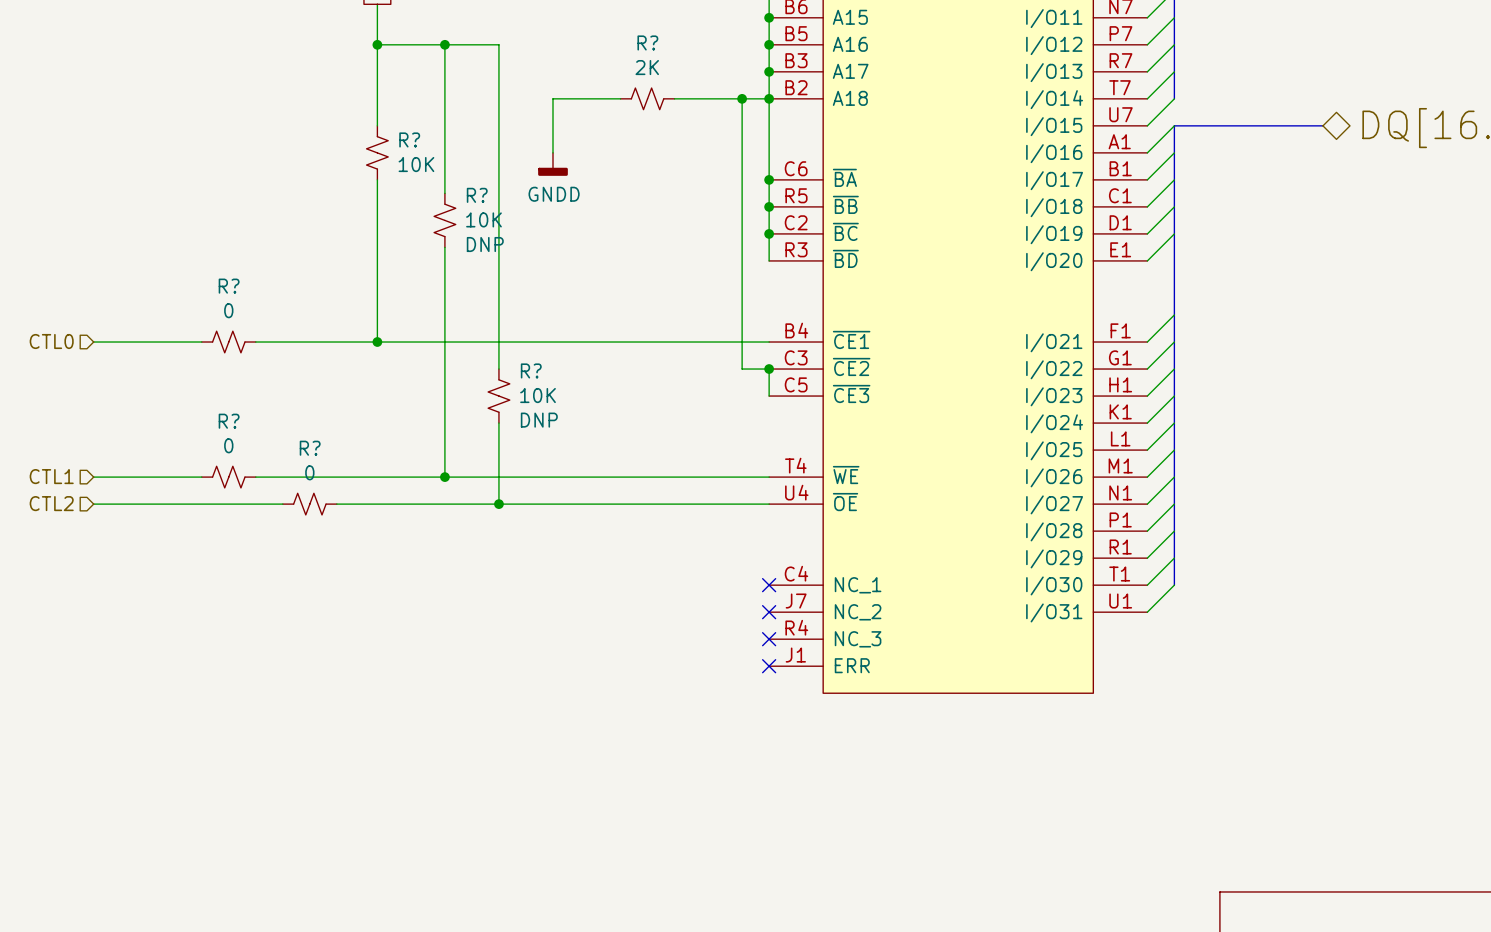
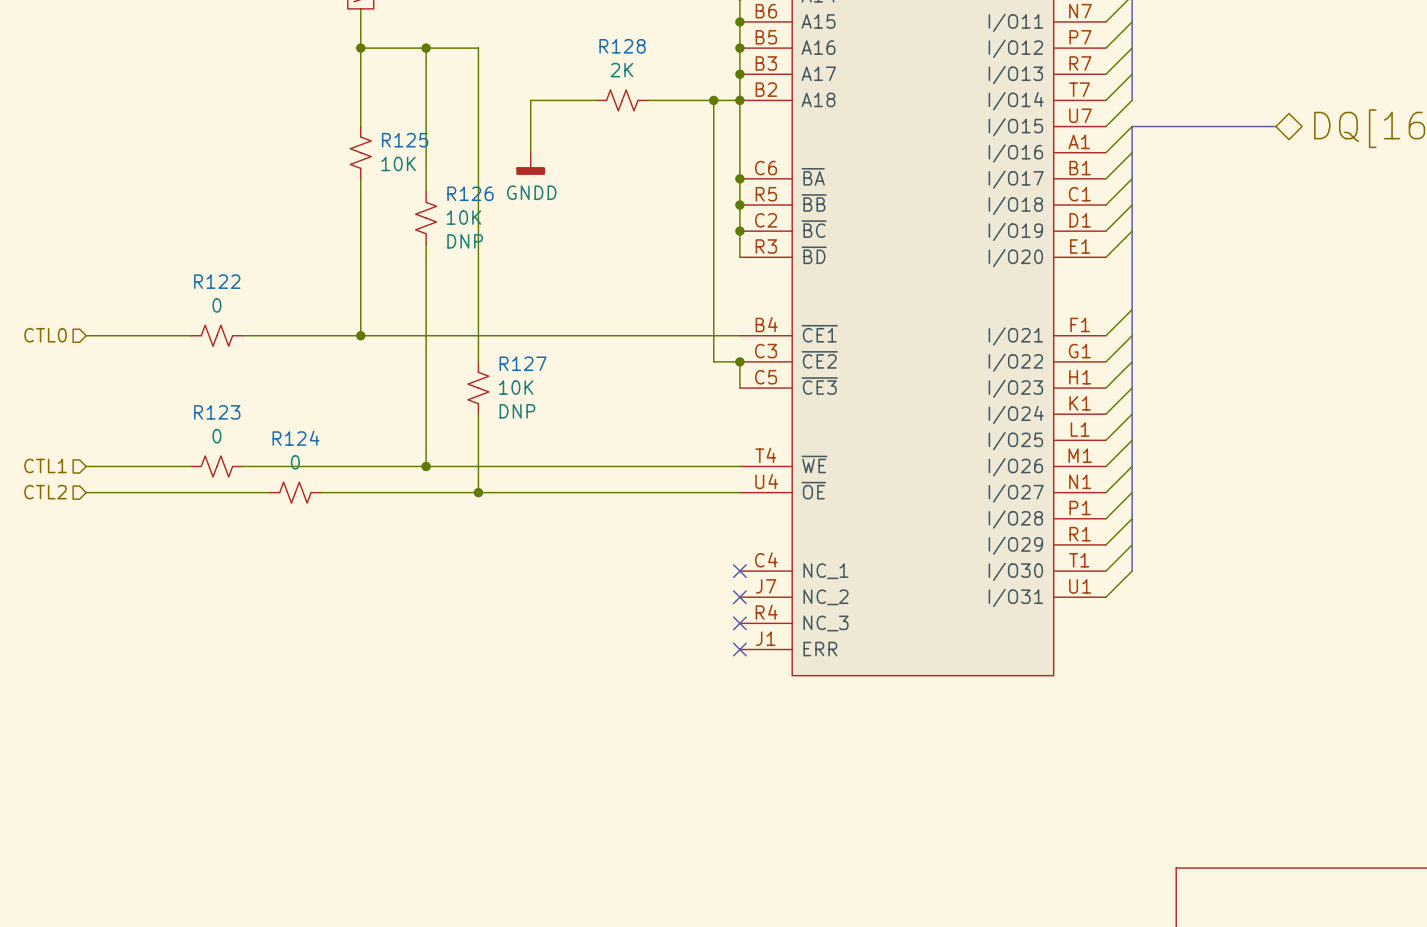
R? name: R? (647, 42) -> R128 (622, 46)
R? name: R? (409, 139) -> R125 (405, 140)
R? name: R? (477, 195) -> R126 (470, 193)
R? name: R? (229, 286) -> R122 (217, 281)
R? name: R? (531, 370) -> R127 (523, 363)
R? name: R? (229, 421) -> R123 (217, 412)
R? name: R? (310, 448) -> R124 (296, 438)

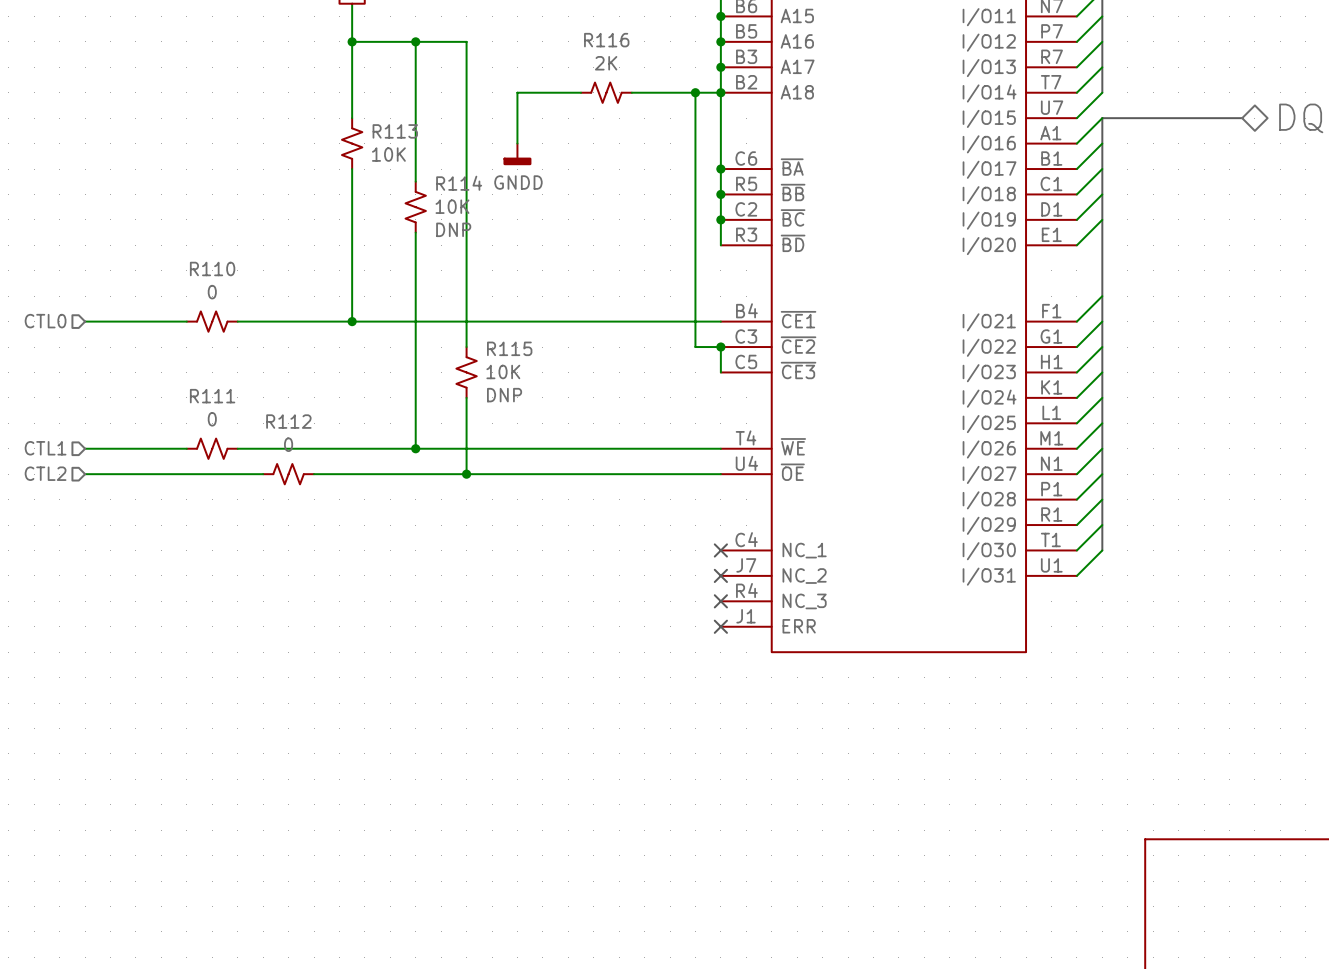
R128 name: R128 (622, 46) -> R116 (606, 40)
R125 name: R125 (405, 140) -> R113 (395, 131)
R126 name: R126 (470, 193) -> R114 (459, 183)
R122 name: R122 (217, 281) -> R110 (212, 268)
R127 name: R127 (523, 363) -> R115 (509, 348)
R123 name: R123 (217, 412) -> R111 (212, 396)
R124 name: R124 (296, 438) -> R112 (288, 421)

